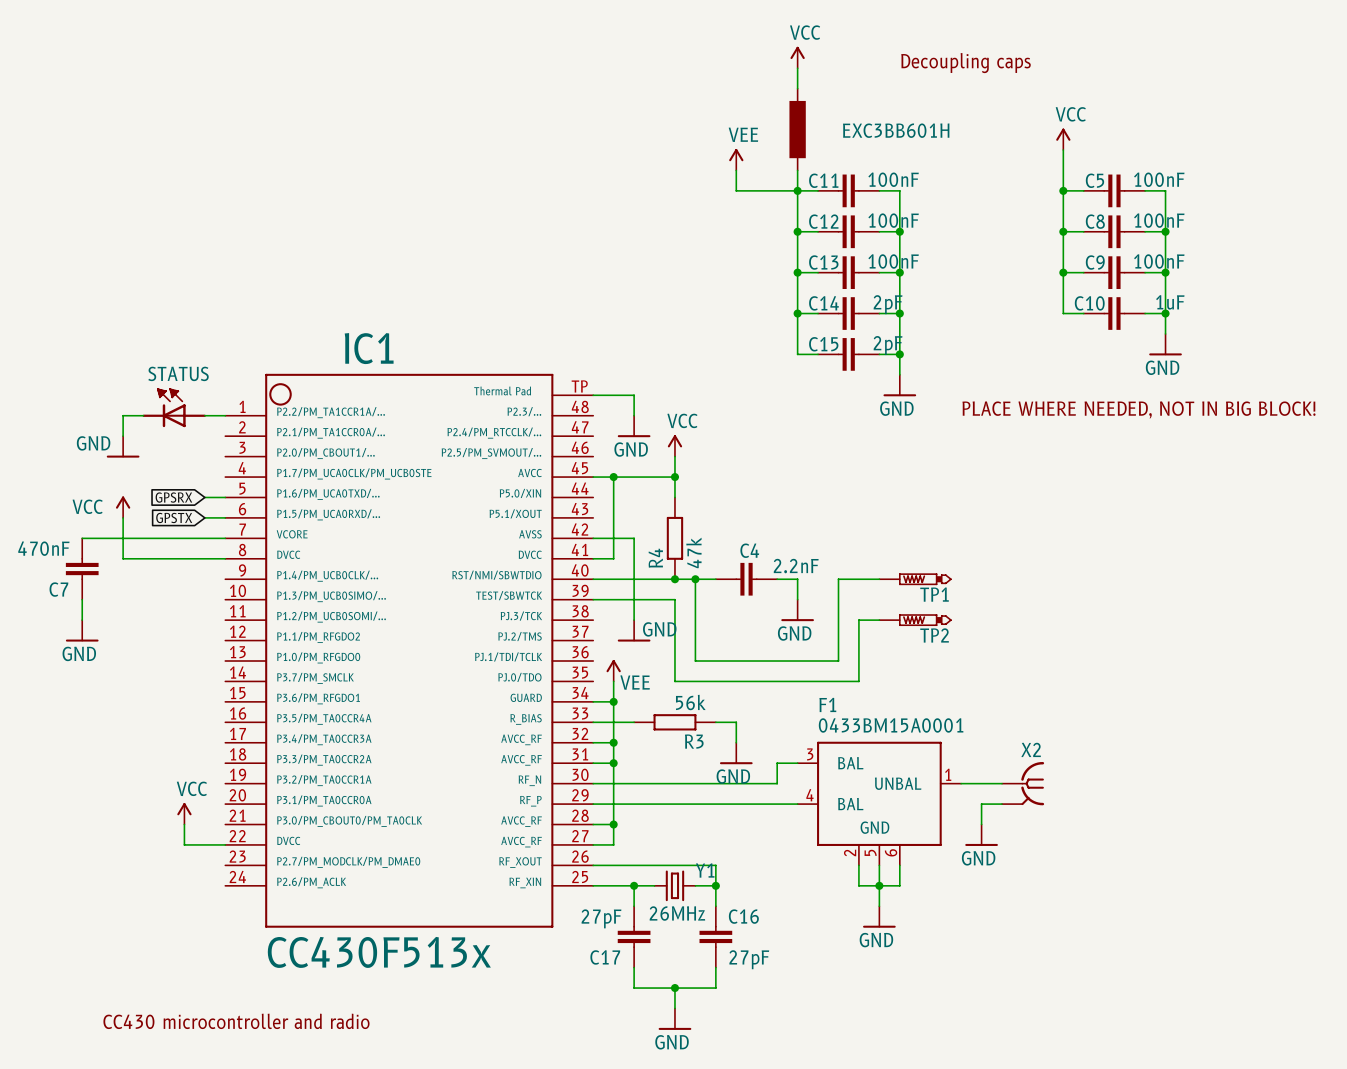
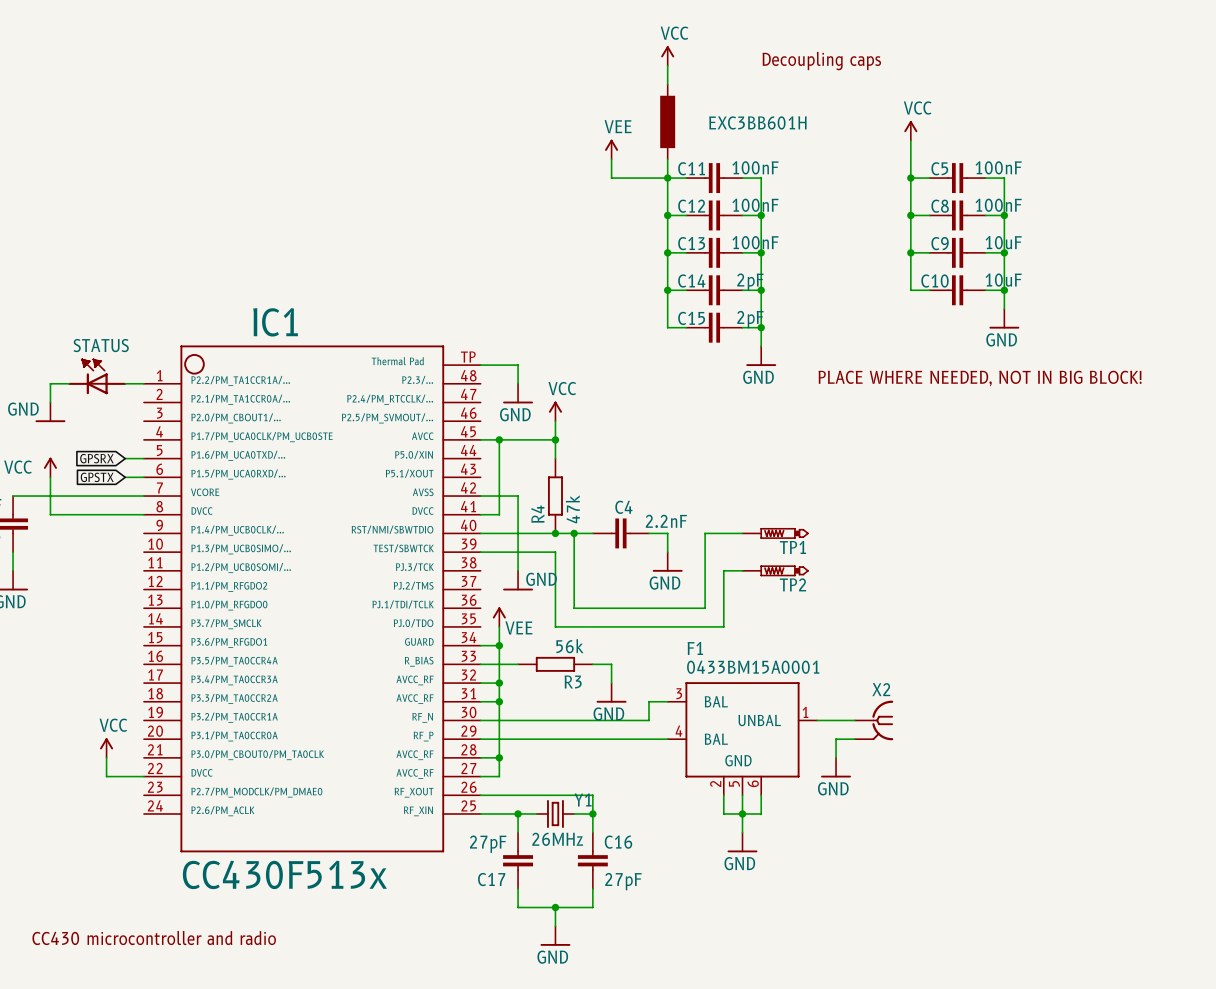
C9 value: 100nF (1159, 261) -> 10uF (1003, 242)
C10 value: 1uF (1170, 302) -> 10uF (1003, 280)

